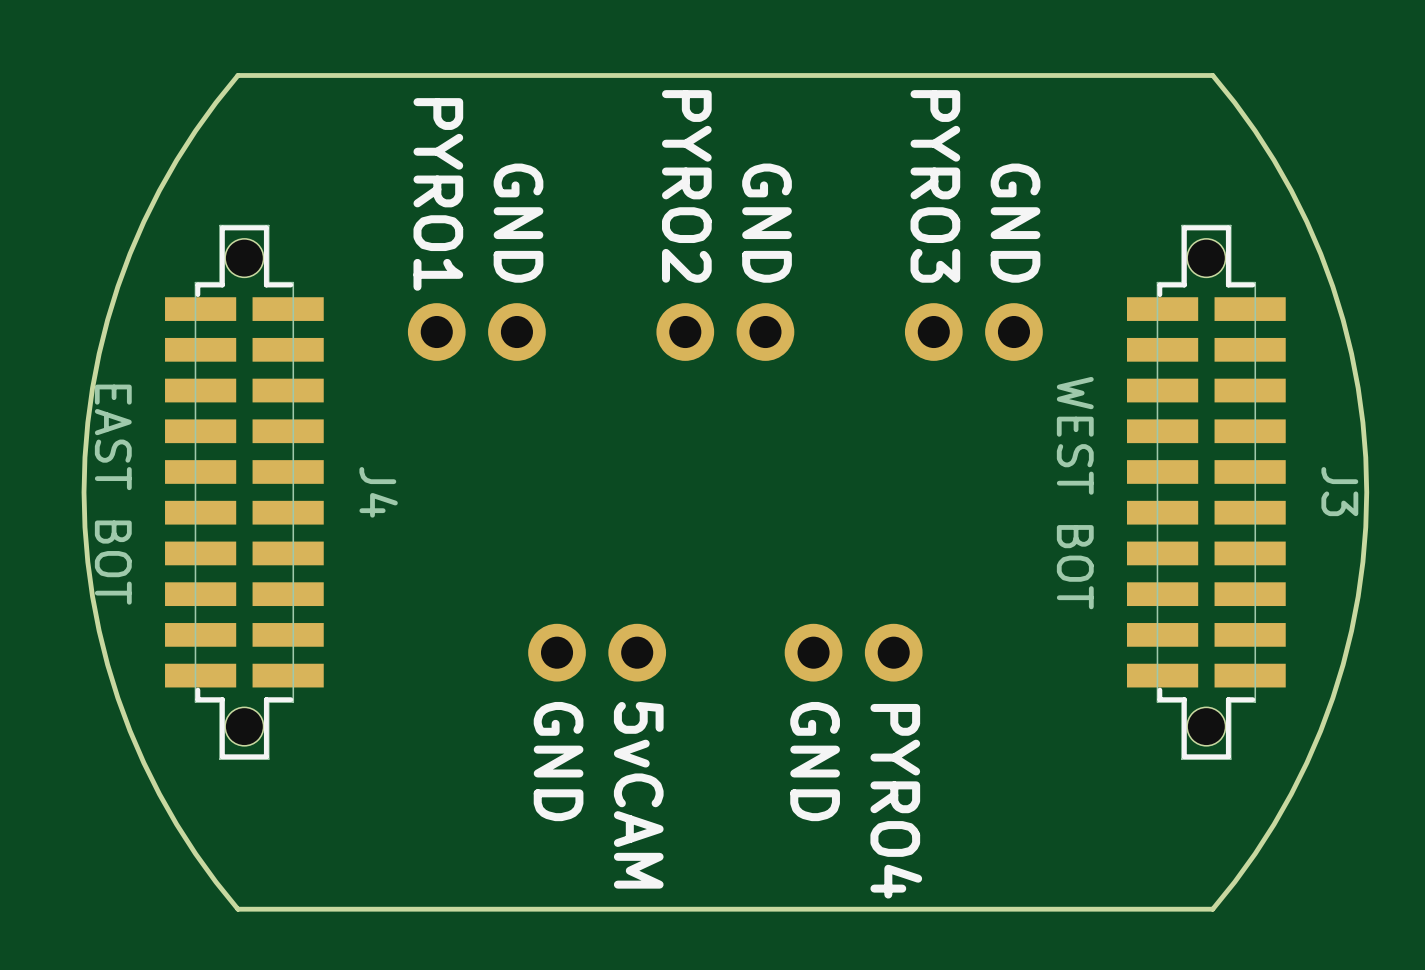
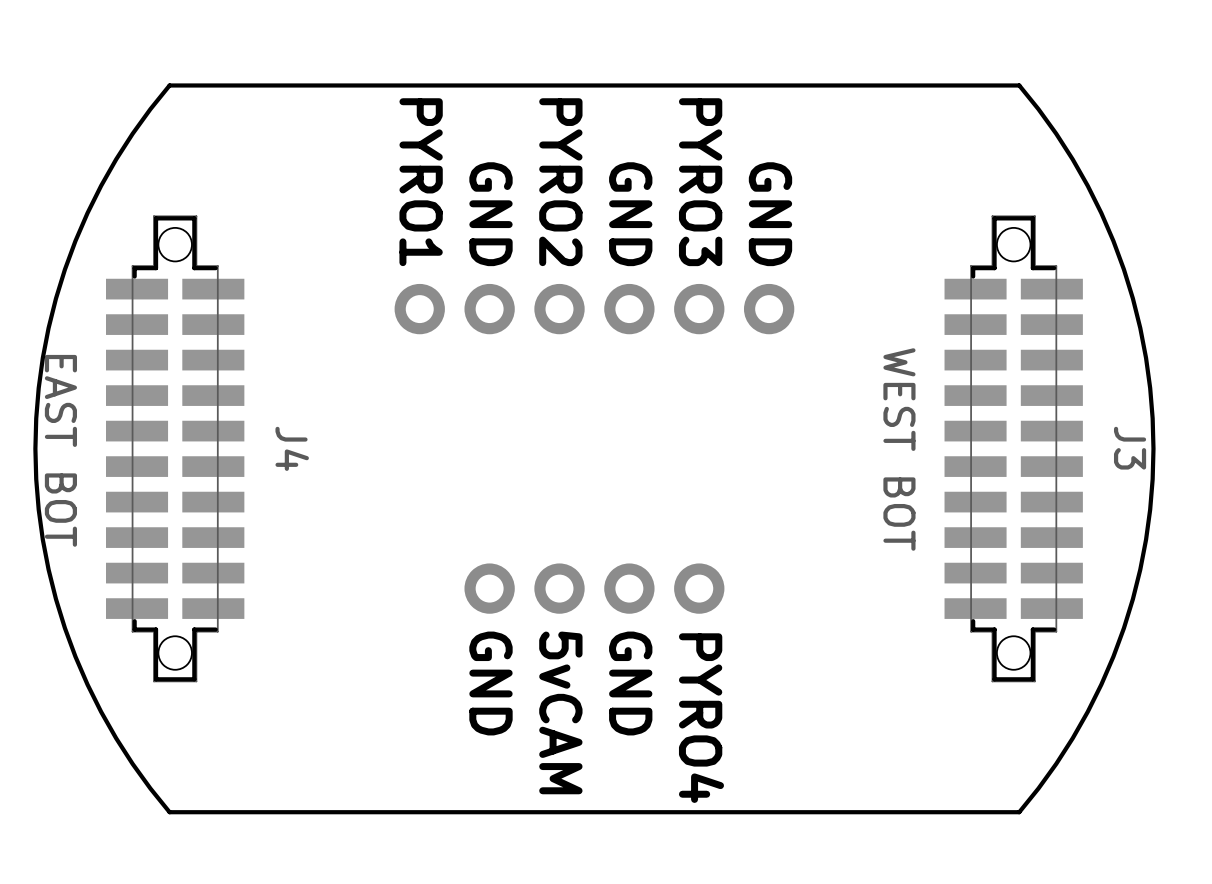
text position: PYRO3 (935, 186) -> PYRO3 (700, 182)
text position: PYRO1 (438, 194) -> PYRO1 (421, 182)
text position: GND (518, 223) -> GND (490, 214)
text position: GND (1015, 223) -> GND (770, 214)
part footprint: [656, 303, 795, 361] -> [394, 283, 795, 335]
part: (476, 332) -> none
part: (973, 332) -> none
part: (597, 652) -> none
part: none -> (594, 588)
part: (853, 652) -> none
text position: GND (558, 761) -> GND (490, 683)
text position: GND (815, 761) -> GND (630, 683)
text position: 5vCAM (638, 795) -> 5vCAM (560, 712)
text position: PYRO4 (896, 801) -> PYRO4 (701, 718)

